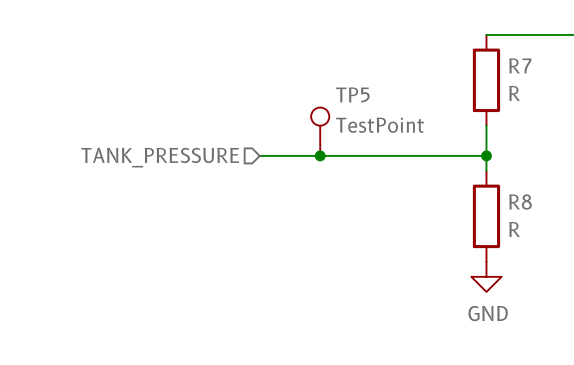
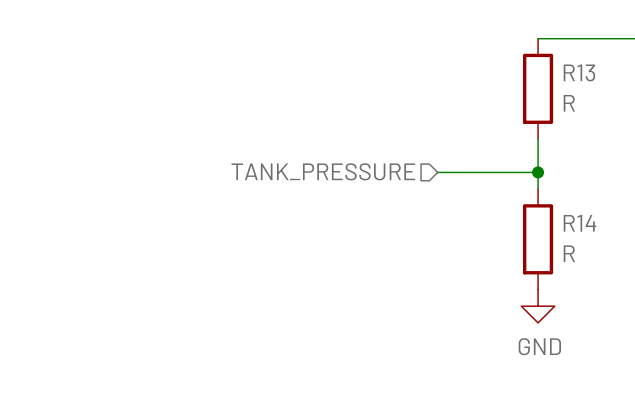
R7 name: R7 (520, 65) -> R13 (579, 72)
TP5: TestPoint (320, 131) -> none
wire: (259, 155) (395, 155) -> none
junction: (320, 155) -> none
hierarchical label position: TANK_PRESSURE (160, 157) -> TANK_PRESSURE (323, 171)
R8 name: R8 (520, 202) -> R14 (579, 223)

